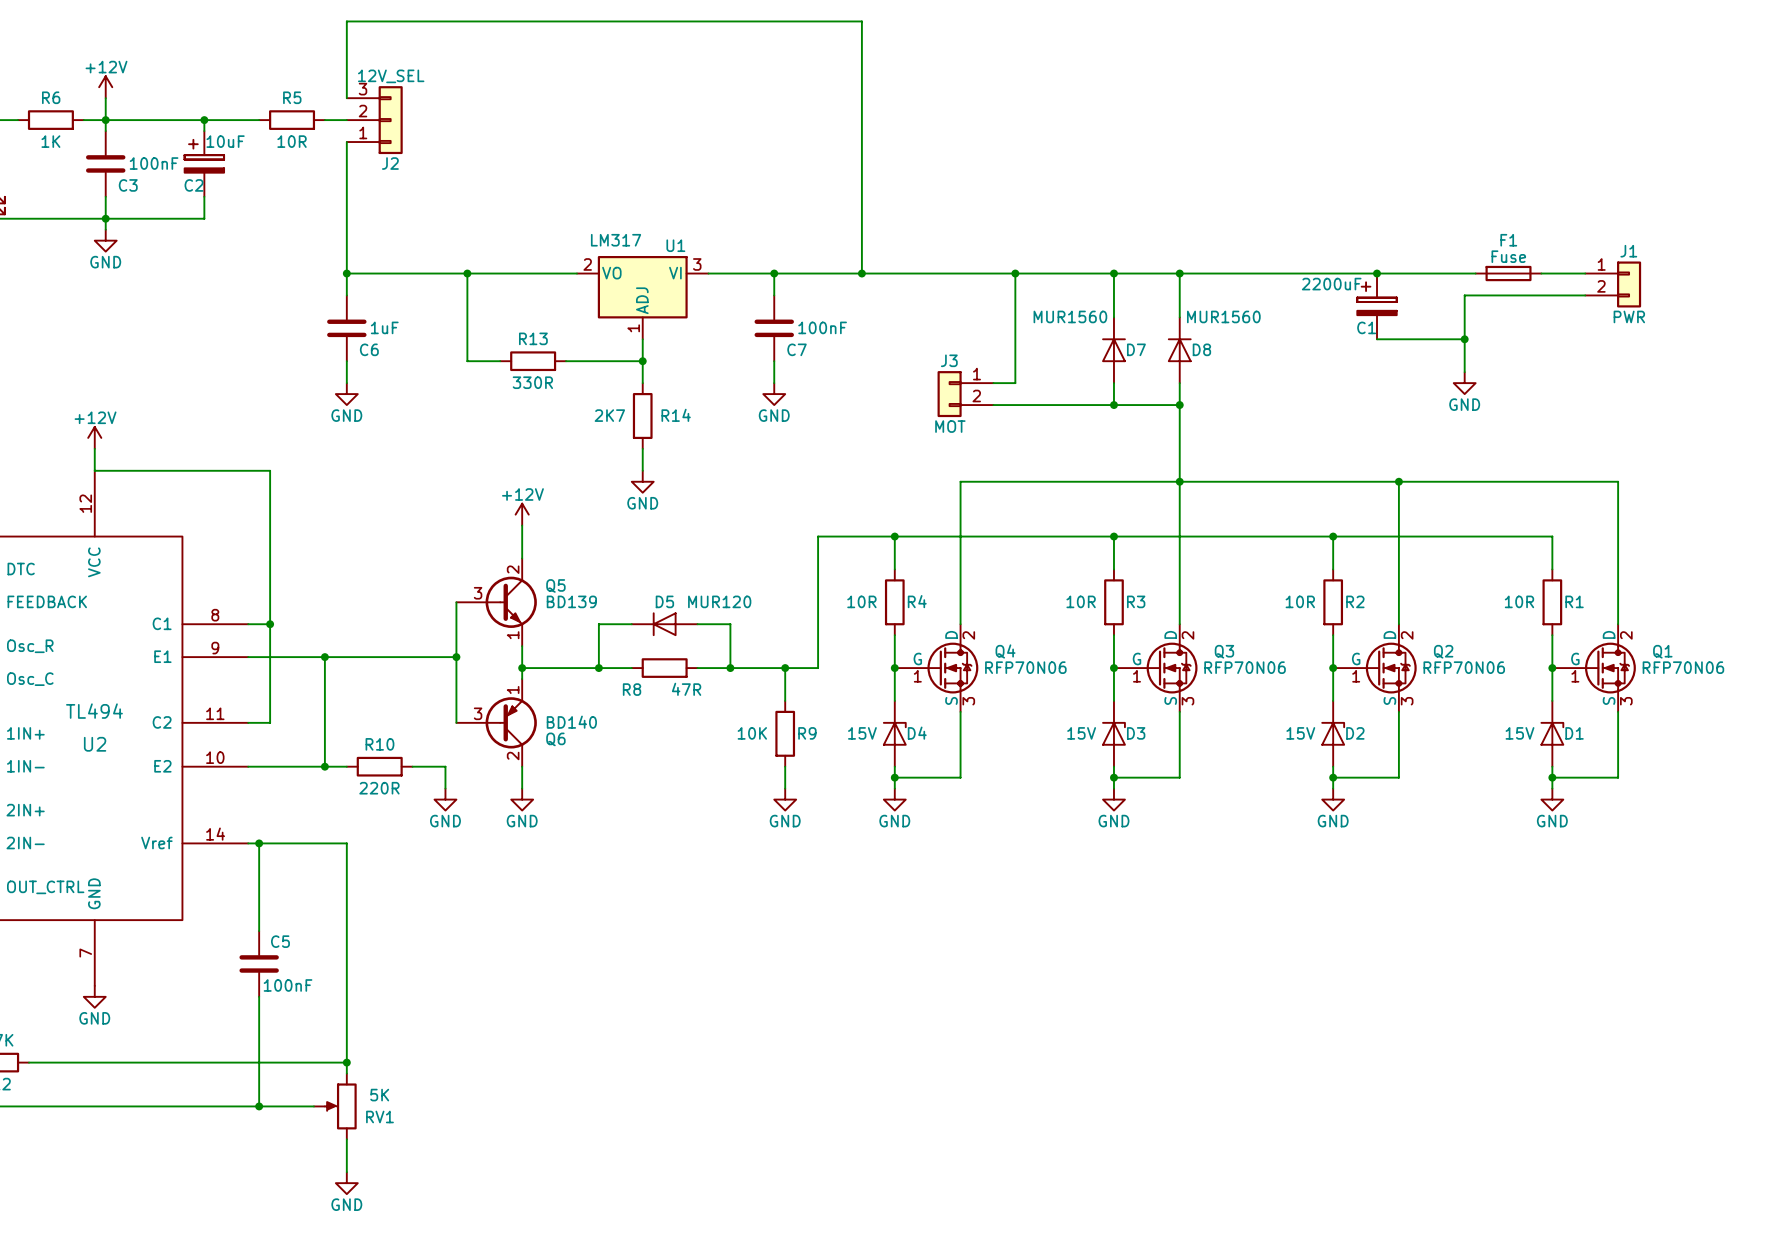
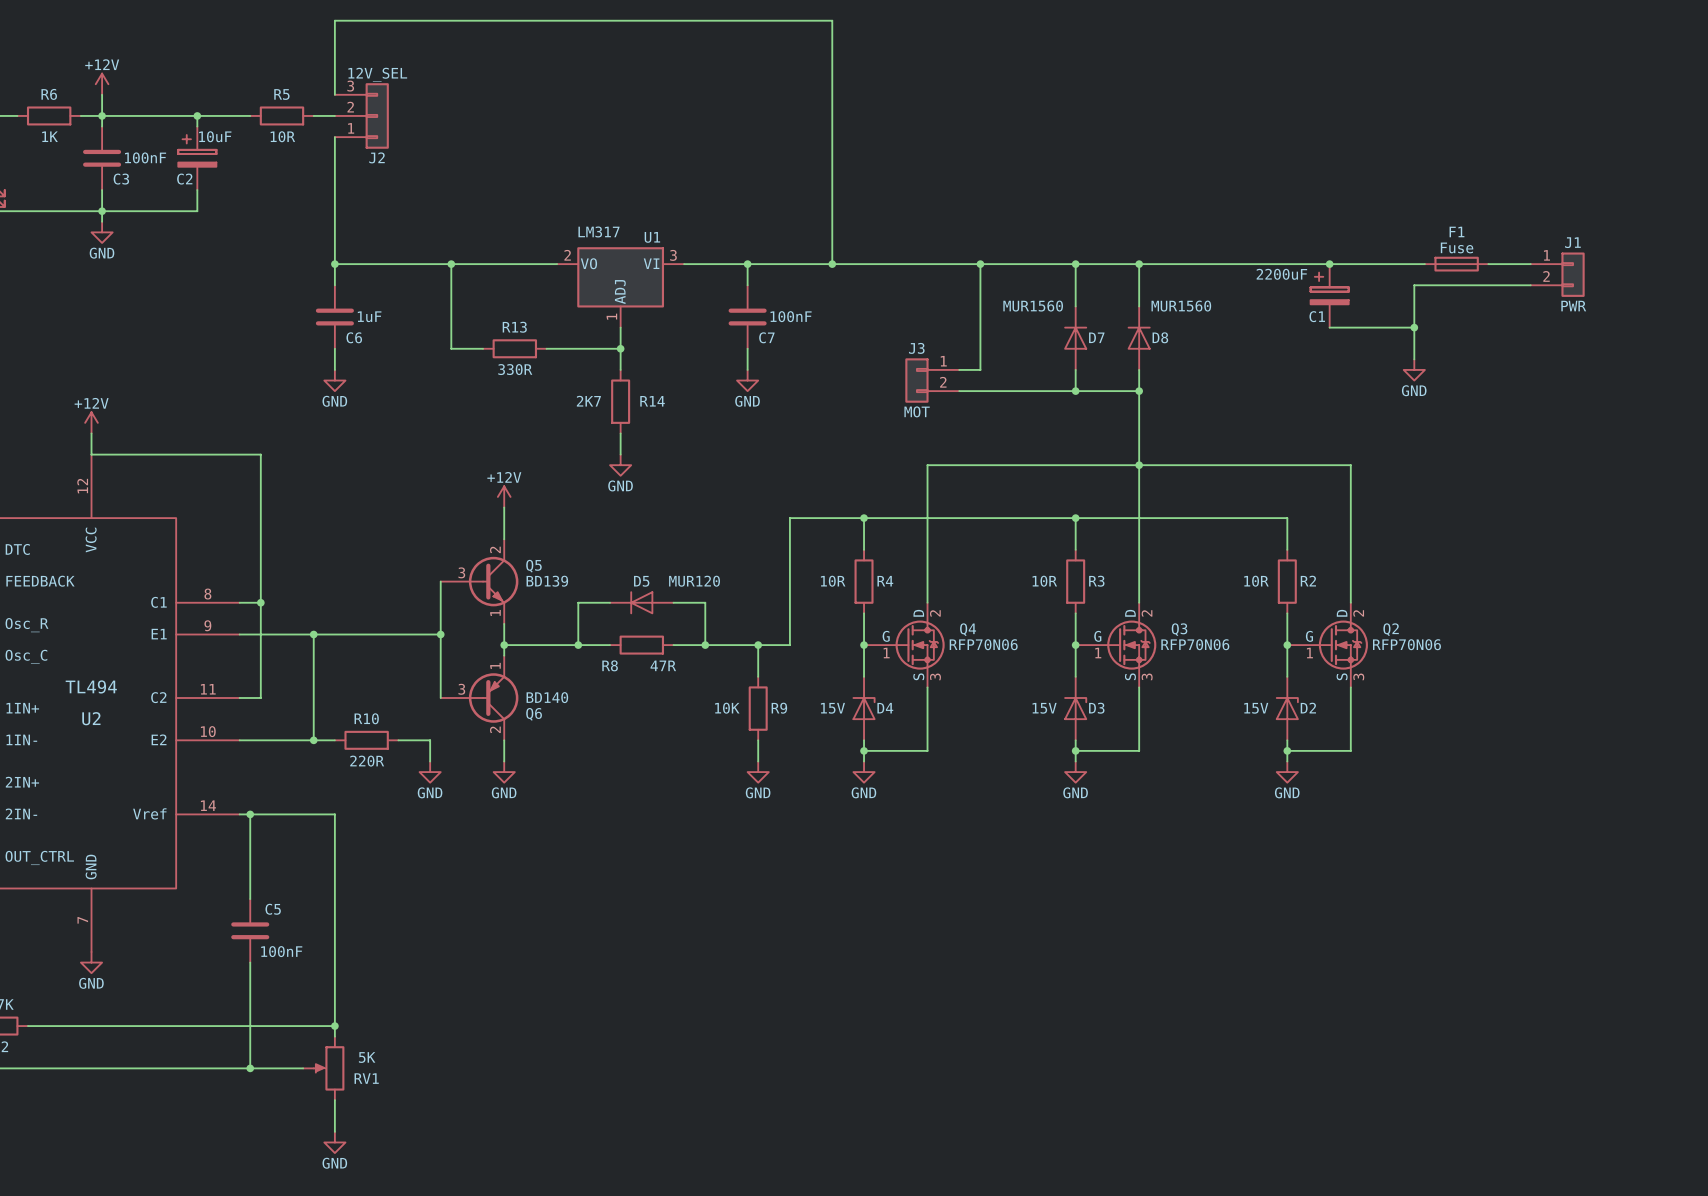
wire: (1398, 481) (1618, 481) (1618, 624) -> none
junction: (1398, 481) -> none
wire: (1333, 536) (1552, 536) (1552, 569) -> none
junction: (1333, 536) -> none
R1: 10R (1552, 602) -> none
wire: (1552, 635) (1552, 700) -> none
junction: (1552, 668) -> none
Q1: RFP70N06 (1594, 668) -> none
wire: (1618, 711) (1618, 777) (1552, 777) -> none
D1: 15V (1552, 733) -> none
wire: (1552, 766) (1552, 788) -> none
junction: (1552, 777) -> none
power symbol: GND (1552, 799) -> none

